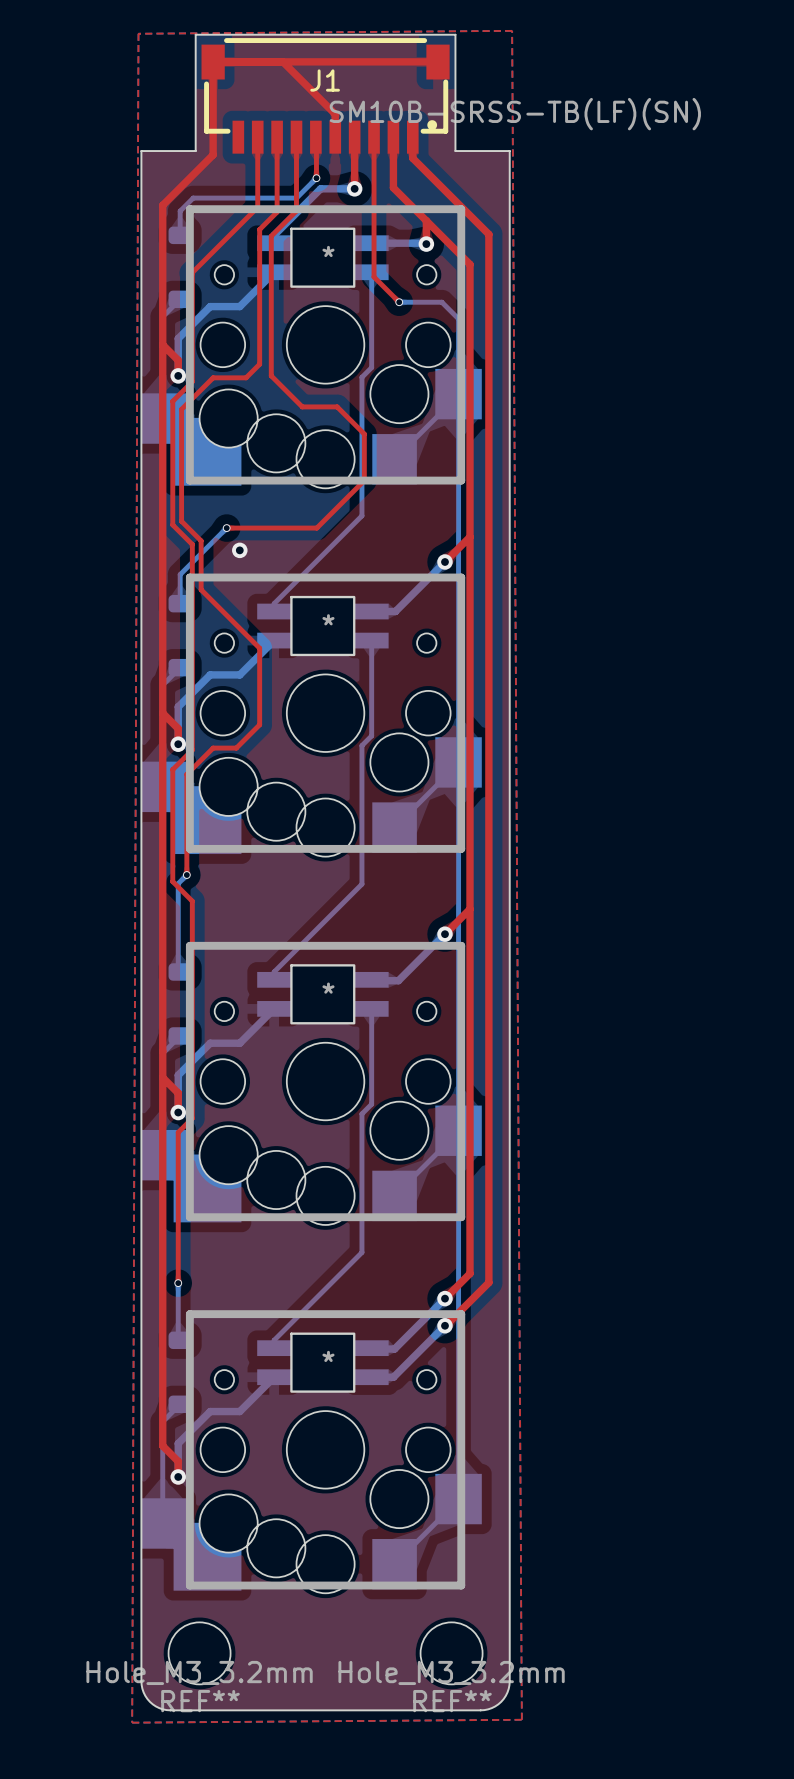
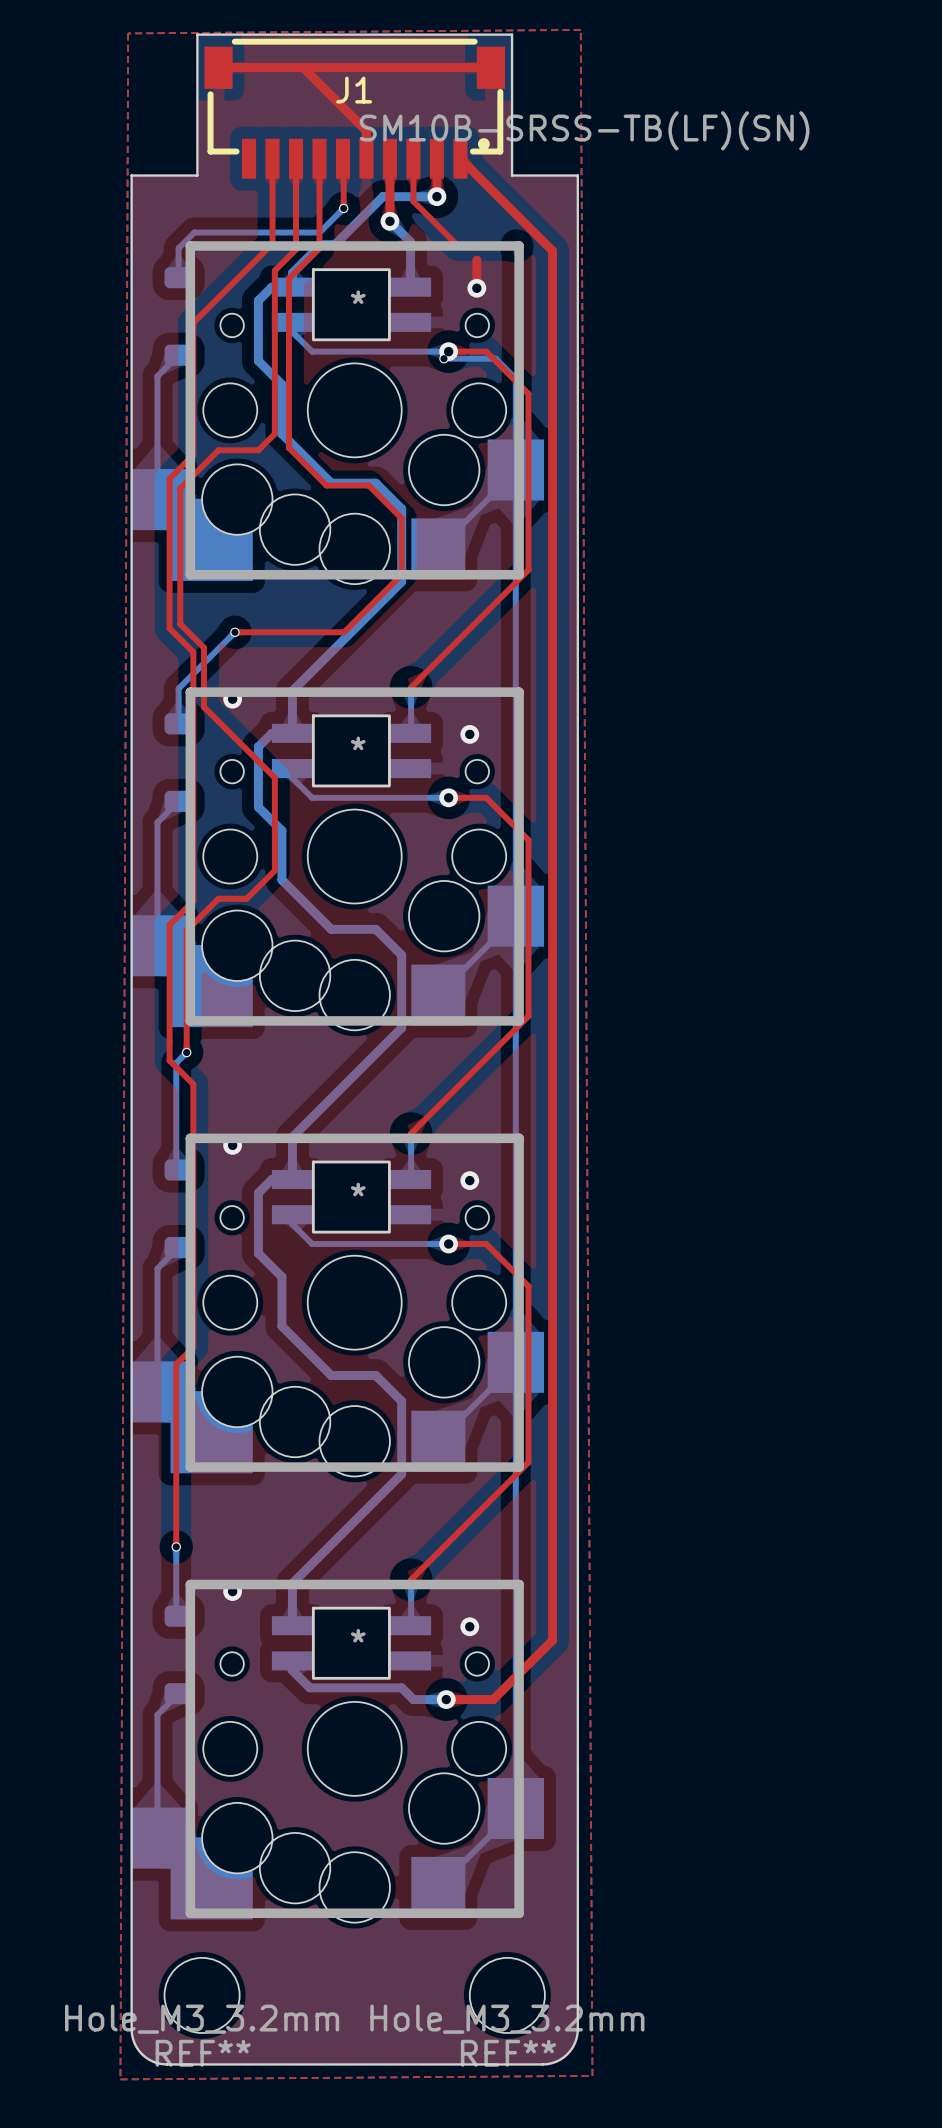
top track: (213, 62) (213, 154) (162, 205) (162, 1445) (178, 1461) (178, 1476) -> none
top track: (412, 137) (412, 158) (488, 234) -> (460, 158) (552, 250) (552, 276)
top track: (393, 168) (393, 187) (469, 264) (469, 1273) (444, 1298) -> none
via: none -> (436, 196)
top track: (374, 172) (374, 277) (399, 302) -> (413, 201) (458, 245) (516, 245)
bottom track: (354, 188) (320, 188) (274, 235) -> (436, 196) (382, 196) (334, 244) (320, 244) (292, 273) (292, 277)
bottom track: (371, 243) (426, 244) -> (410, 287) (410, 241) (389, 221)
bottom track: (274, 272) (239, 306) (210, 306) (178, 338) (178, 372) -> (292, 322) (292, 331) (312, 351) (448, 351)
bottom track: (371, 272) (371, 367) (361, 377) (361, 515) (274, 603) -> (292, 287) (271, 287) (258, 300) (258, 361) (281, 384) (281, 433) (331, 483) (375, 483) (401, 508) (401, 581) (292, 691) (292, 723)
top track: none -> (448, 351) (486, 351) (528, 393) (528, 570) (411, 687)
via: none -> (448, 351)
top track: (162, 344) (178, 360) (178, 375) -> none
via: (178, 375) -> none
top track: (469, 537) (444, 561) -> none
via position: (239, 550) -> (232, 699)
bottom track: (444, 561) (395, 611) (371, 611) -> (411, 687) (410, 733)
via: (444, 561) -> none
via: none -> (469, 734)
bottom track: (274, 640) (239, 674) (210, 674) (178, 706) (178, 740) -> (292, 768) (292, 778) (312, 797) (448, 797)
bottom track: (371, 640) (371, 735) (361, 745) (361, 884) (274, 971) -> (292, 733) (271, 733) (258, 746) (258, 807) (281, 830) (281, 880) (331, 929) (375, 929) (401, 955) (401, 1027) (292, 1137) (292, 1169)
top track: none -> (448, 797) (486, 797) (528, 840) (528, 1016) (411, 1133)
via: none -> (448, 797)
top track: (162, 713) (178, 728) (178, 744) -> none
via: (178, 744) -> none
top track: (469, 909) (444, 934) -> none
bottom track: (444, 934) (398, 980) (372, 980) -> none
via position: (444, 934) -> (469, 1180)
bottom track: none -> (411, 1133) (410, 1179)
via: none -> (232, 1145)
bottom track: (274, 1008) (239, 1043) (210, 1043) (178, 1075) (178, 1108) -> (292, 1214) (292, 1224) (312, 1243) (448, 1243)
bottom track: (371, 1008) (371, 1104) (361, 1113) (361, 1252) (274, 1340) -> (292, 1179) (271, 1179) (258, 1192) (258, 1253) (281, 1276) (281, 1326) (331, 1375) (375, 1375) (401, 1401) (401, 1474) (292, 1583) (292, 1616)
top track: none -> (448, 1243) (486, 1243) (528, 1286) (528, 1462) (411, 1579)
via: none -> (448, 1243)
top track: (162, 1077) (178, 1093) (178, 1112) -> none
via: (178, 1112) -> none
top track: (488, 1282) (444, 1325) -> (552, 1546) (552, 1640) (493, 1699) (446, 1699)
bottom track: (444, 1298) (394, 1349) (372, 1349) -> none
via: (444, 1298) -> none
bottom track: none -> (411, 1579) (410, 1625)
via: none -> (232, 1591)
bottom track: (444, 1325) (393, 1377) (371, 1377) -> none
via: (444, 1325) -> none
via: none -> (469, 1626)
bottom track: (274, 1377) (239, 1411) (210, 1411) (178, 1443) (178, 1476) -> (292, 1660) (292, 1670) (309, 1687) (401, 1687) (413, 1699) (446, 1699)
via: none -> (446, 1699)
via: (178, 1476) -> none

